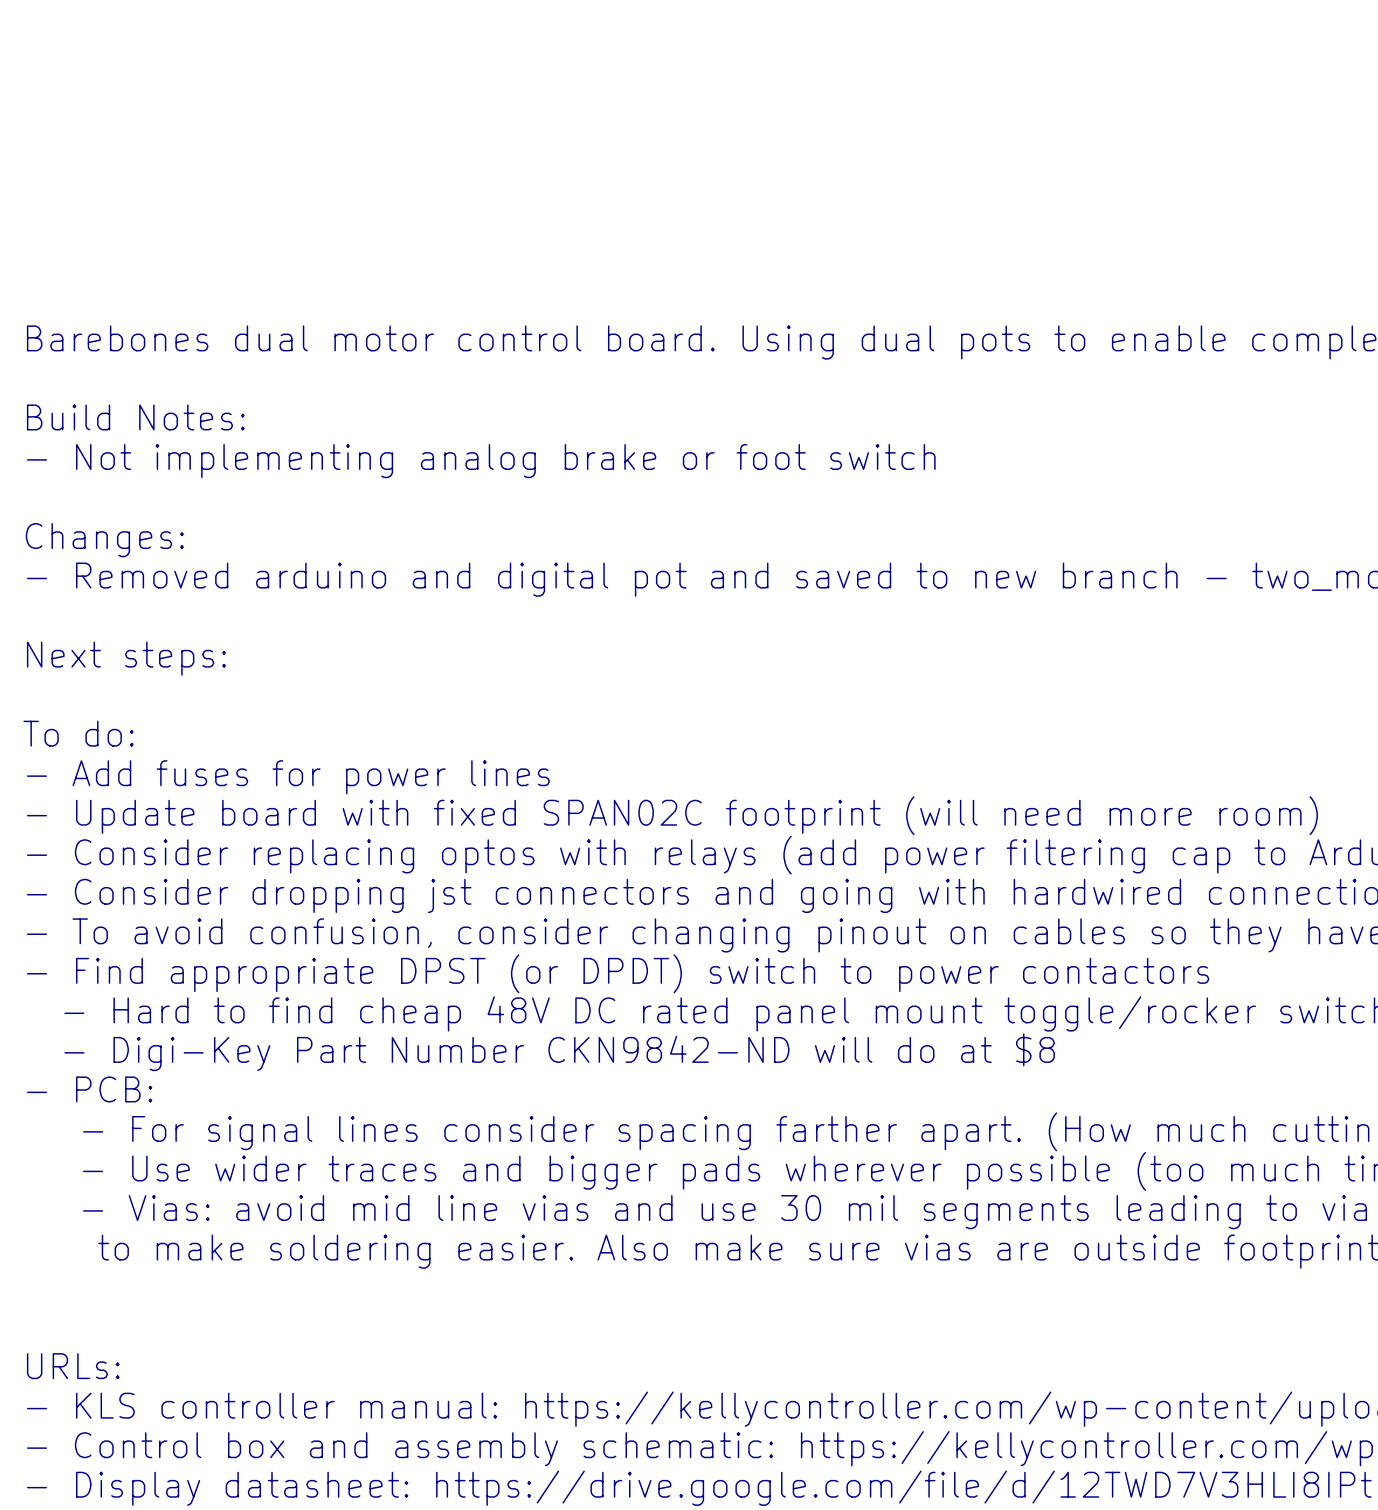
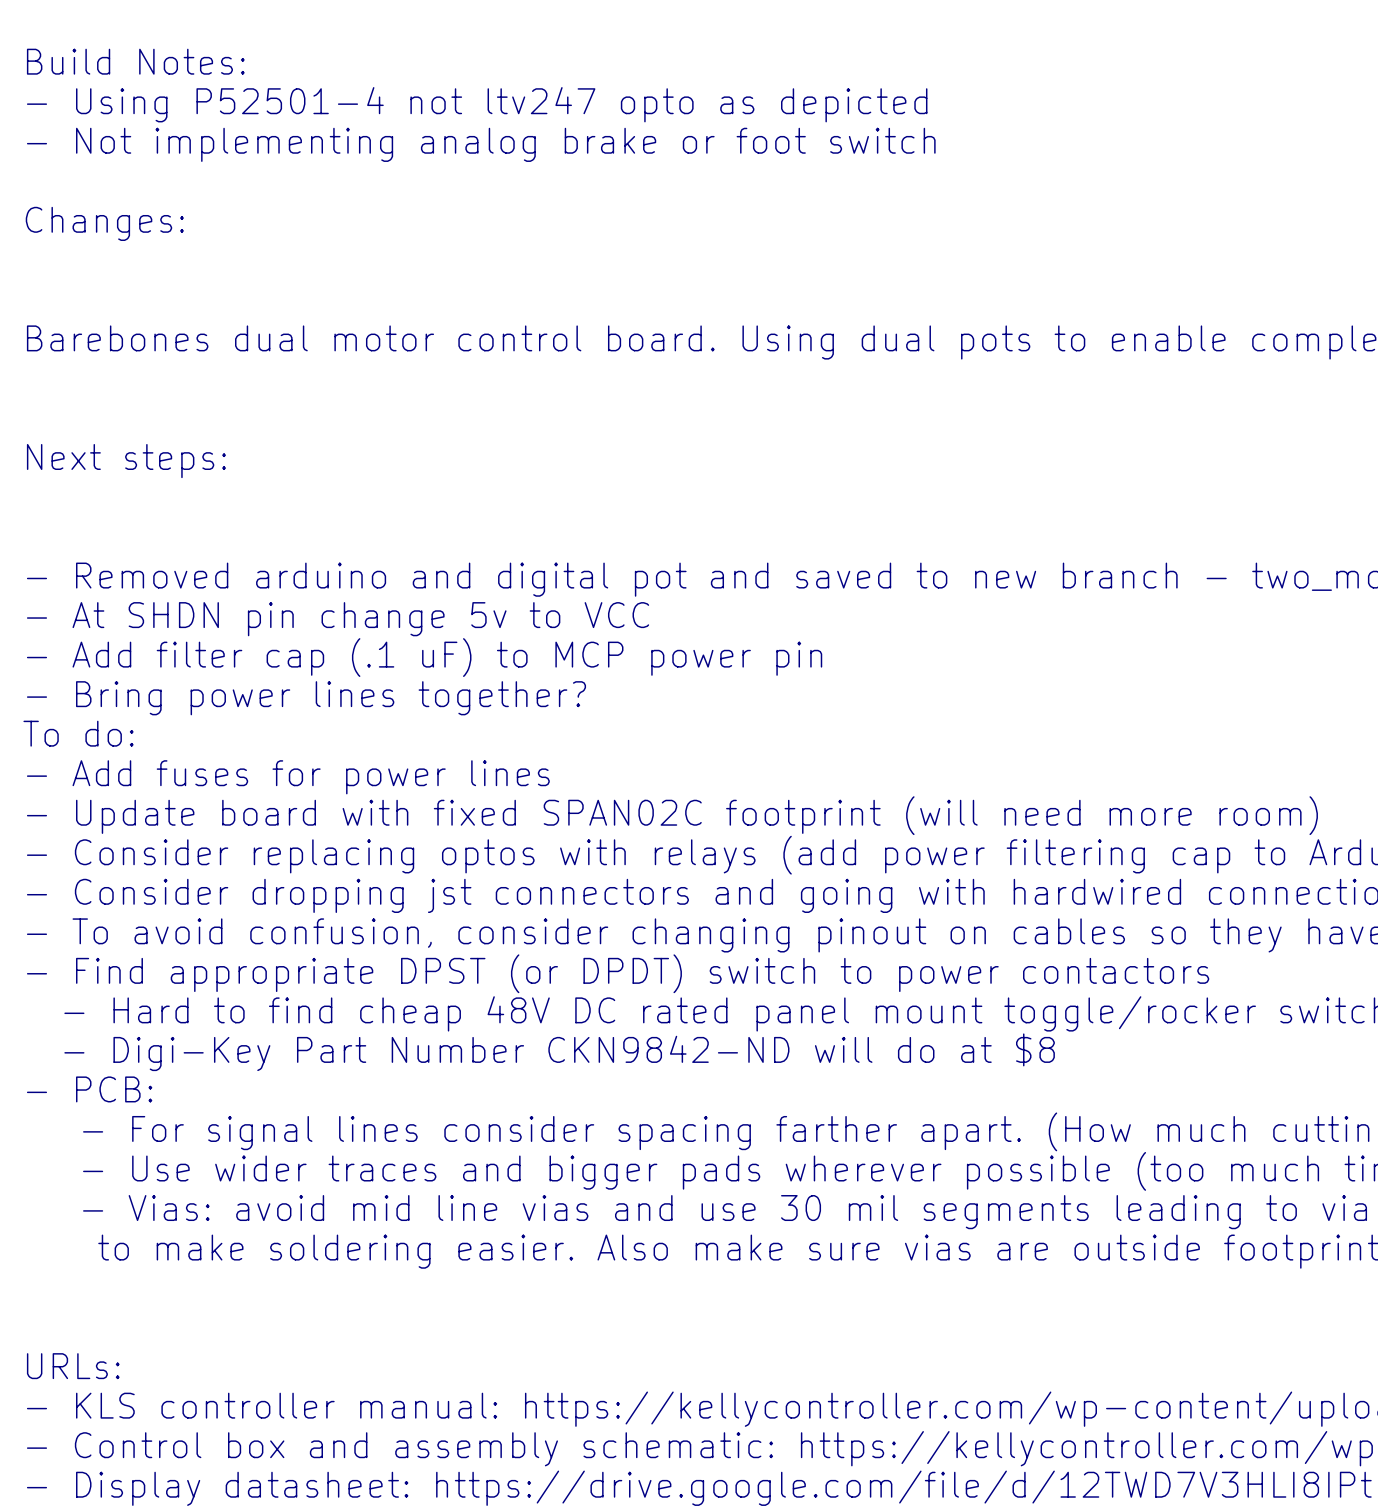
text: none -> Build Notes: (135, 61)
text: none -> - Using P52501-4 not ltv247 opto as depicted (477, 104)
text: none -> - Not implementing analog brake or foot switch (481, 144)
text: none -> Changes: (104, 223)
text: Build Notes: (135, 417) -> none
text: - Not implementing analog brake or foot switch (481, 461) -> Next steps: (126, 461)
text: Changes: (104, 540) -> none
text: none -> - At SHDN pin change 5v to VCC (338, 619)
text: Next steps: (126, 658) -> - Add filter cap (.1 uF) to MCP power pin (424, 657)
text: none -> - Bring power lines together? (306, 698)

